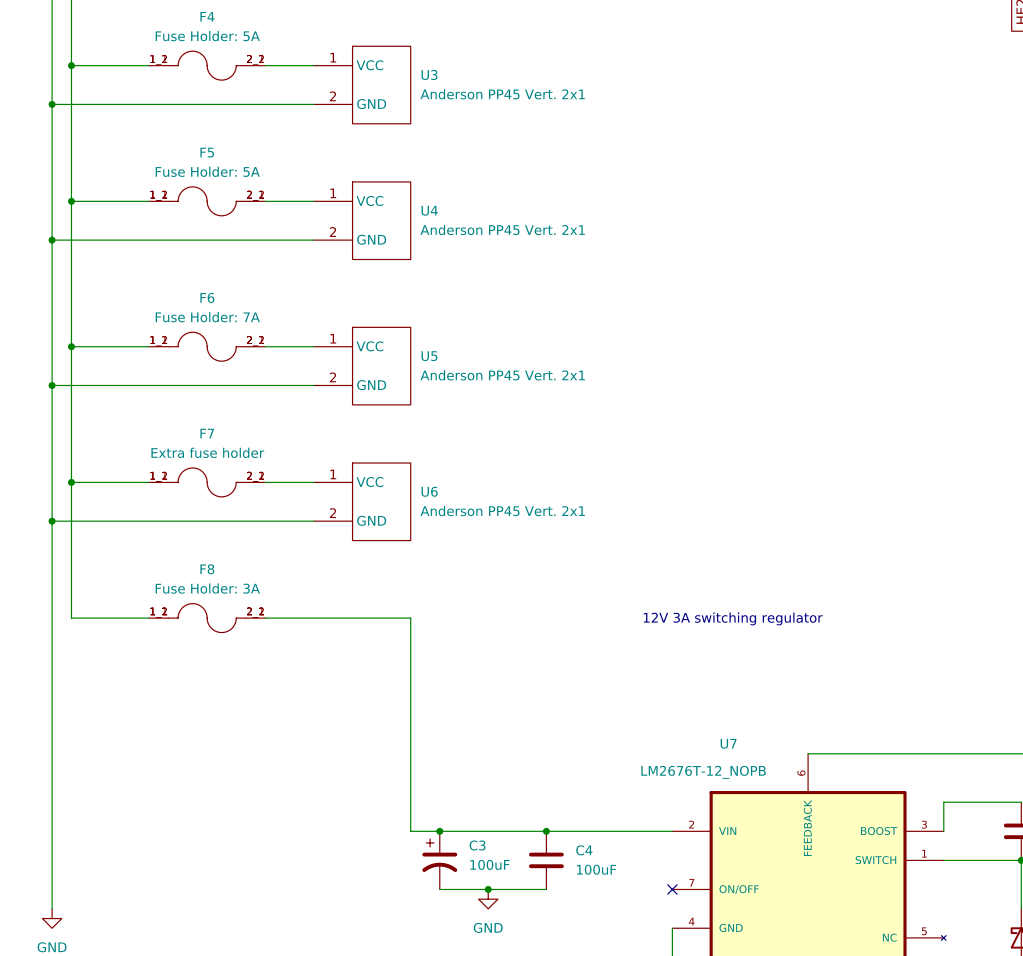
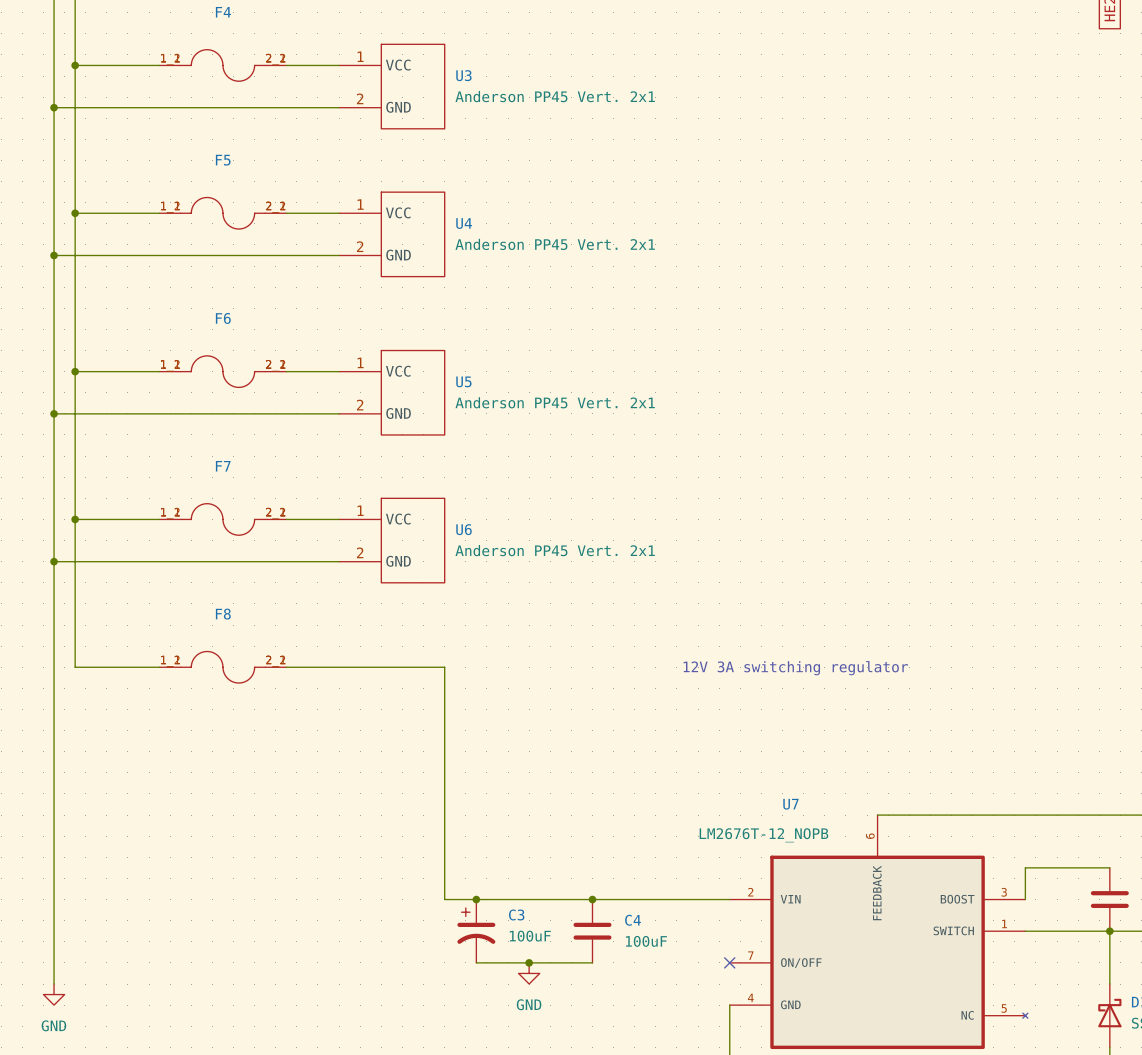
F4 value: Fuse Holder: 5A (207, 36) -> none
F5 value: Fuse Holder: 5A (207, 171) -> none
F6 value: Fuse Holder: 7A (207, 317) -> none
F7 value: Extra fuse holder (207, 452) -> none
F8 value: Fuse Holder: 3A (207, 588) -> none

